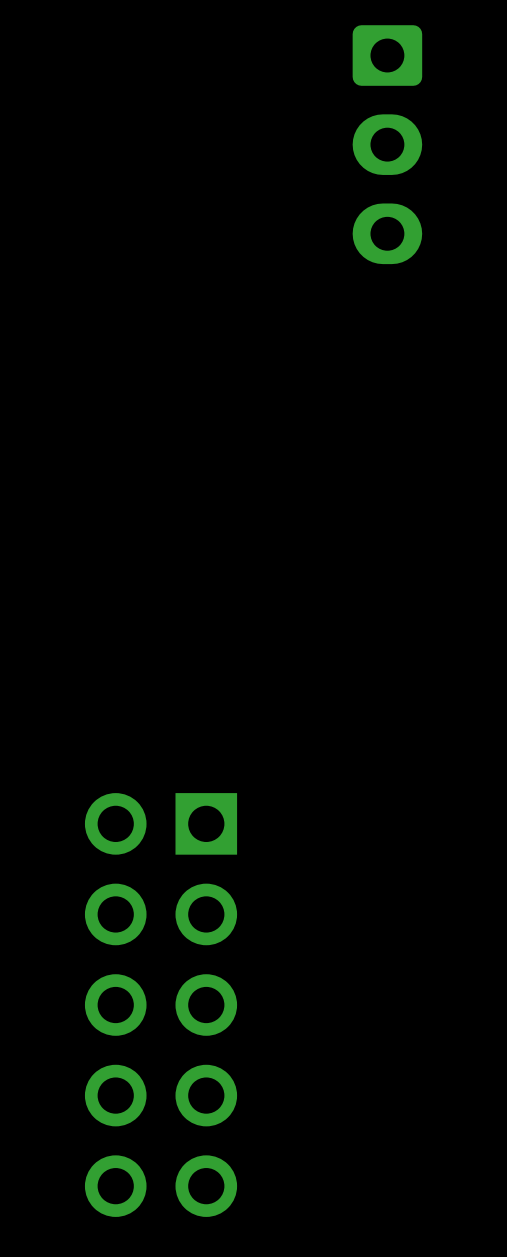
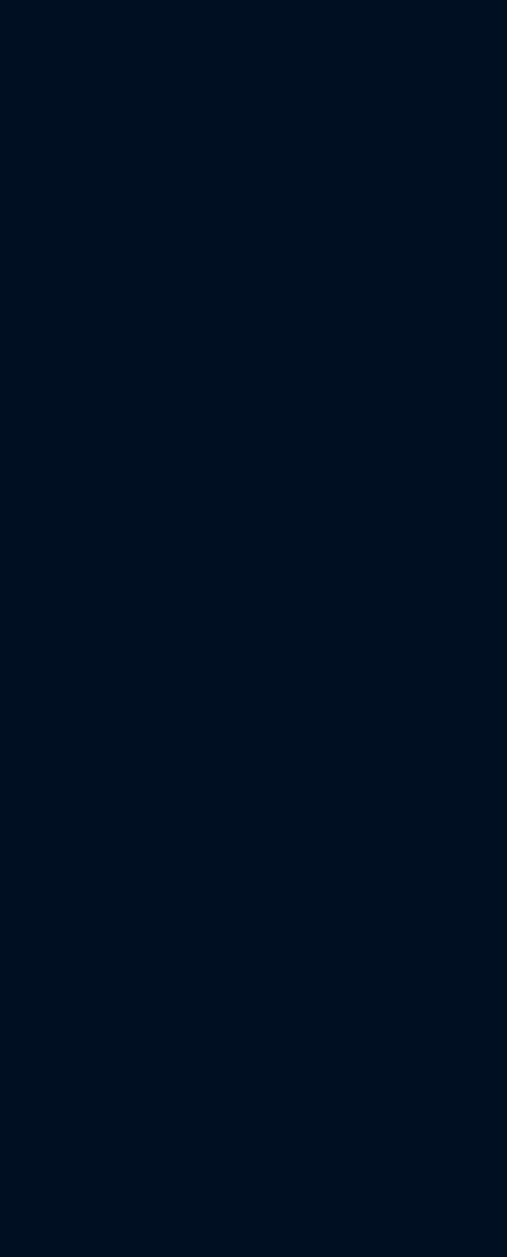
part: (387, 144) -> none
part: (161, 1005) -> none

